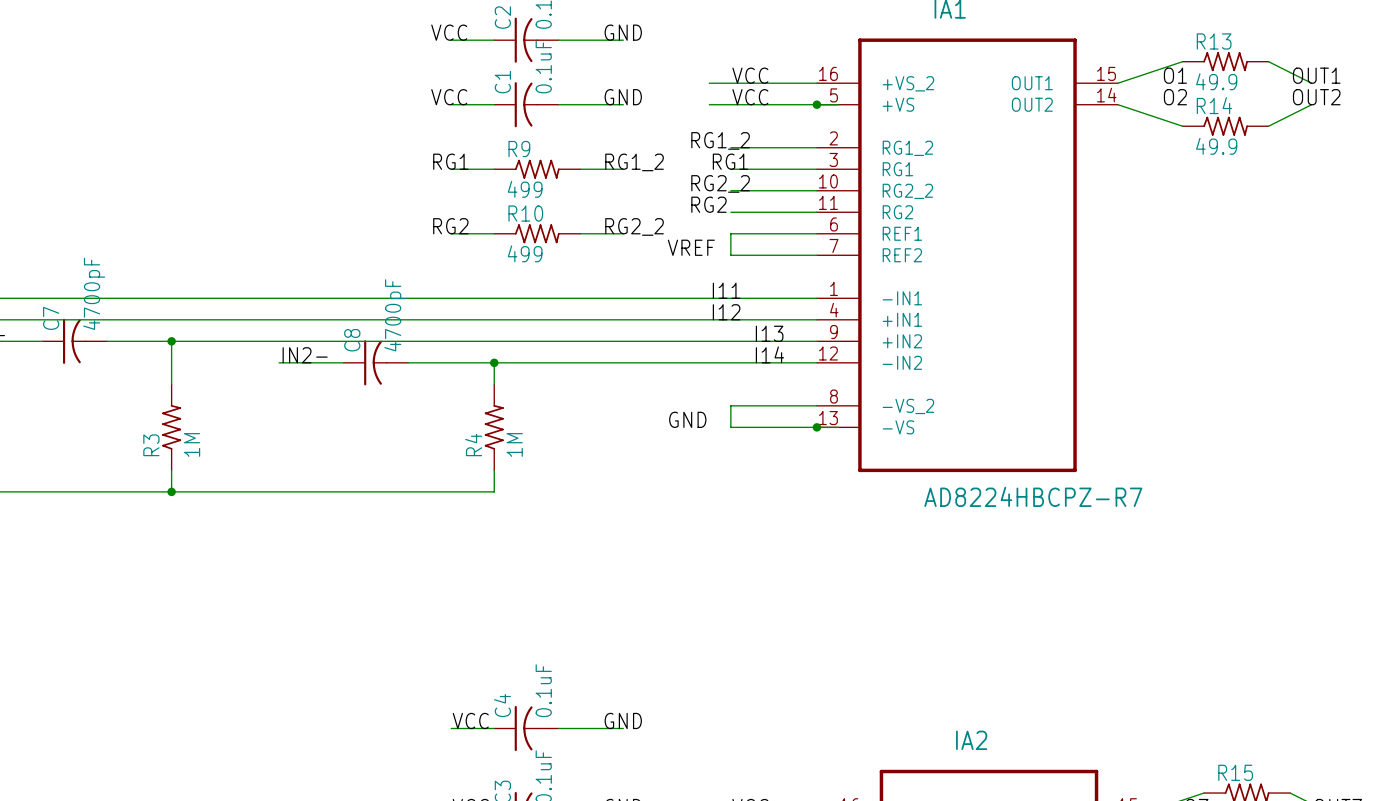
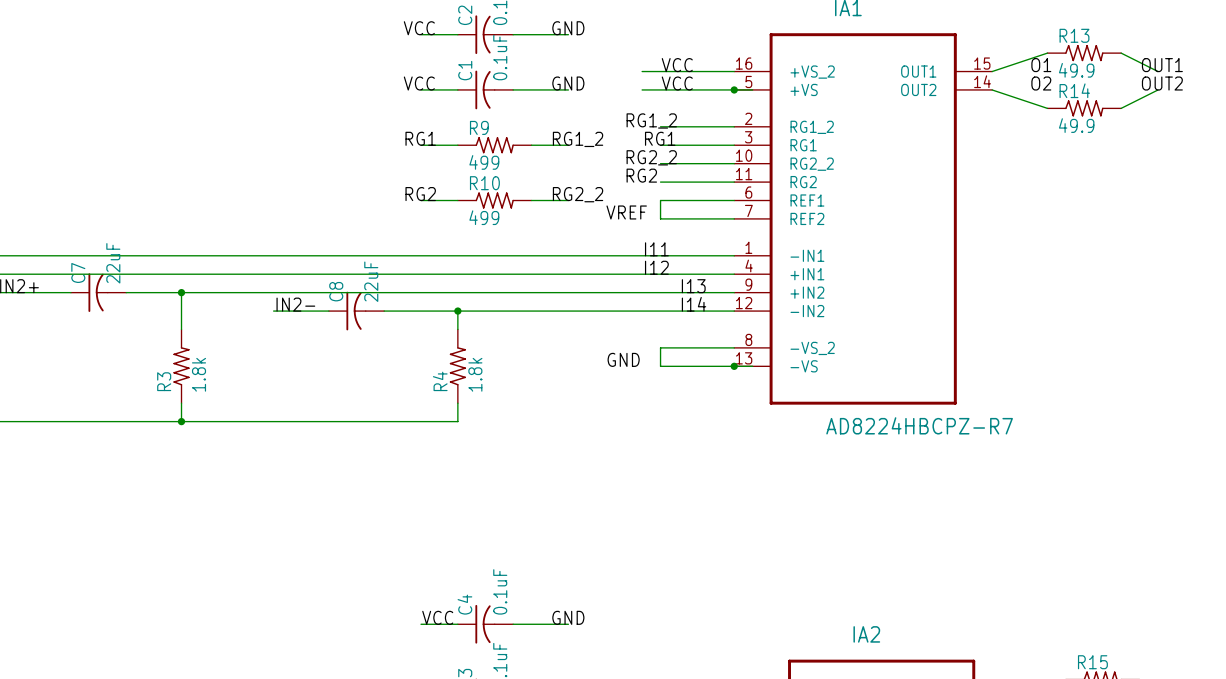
C7 value: 4700pF (94, 293) -> 22uF (113, 263)
C8 value: 4700pF (395, 315) -> 22uF (371, 281)
R3 value: 1M (192, 444) -> 1.8k (199, 374)
R4 value: 1M (514, 444) -> 1.8k (475, 374)

